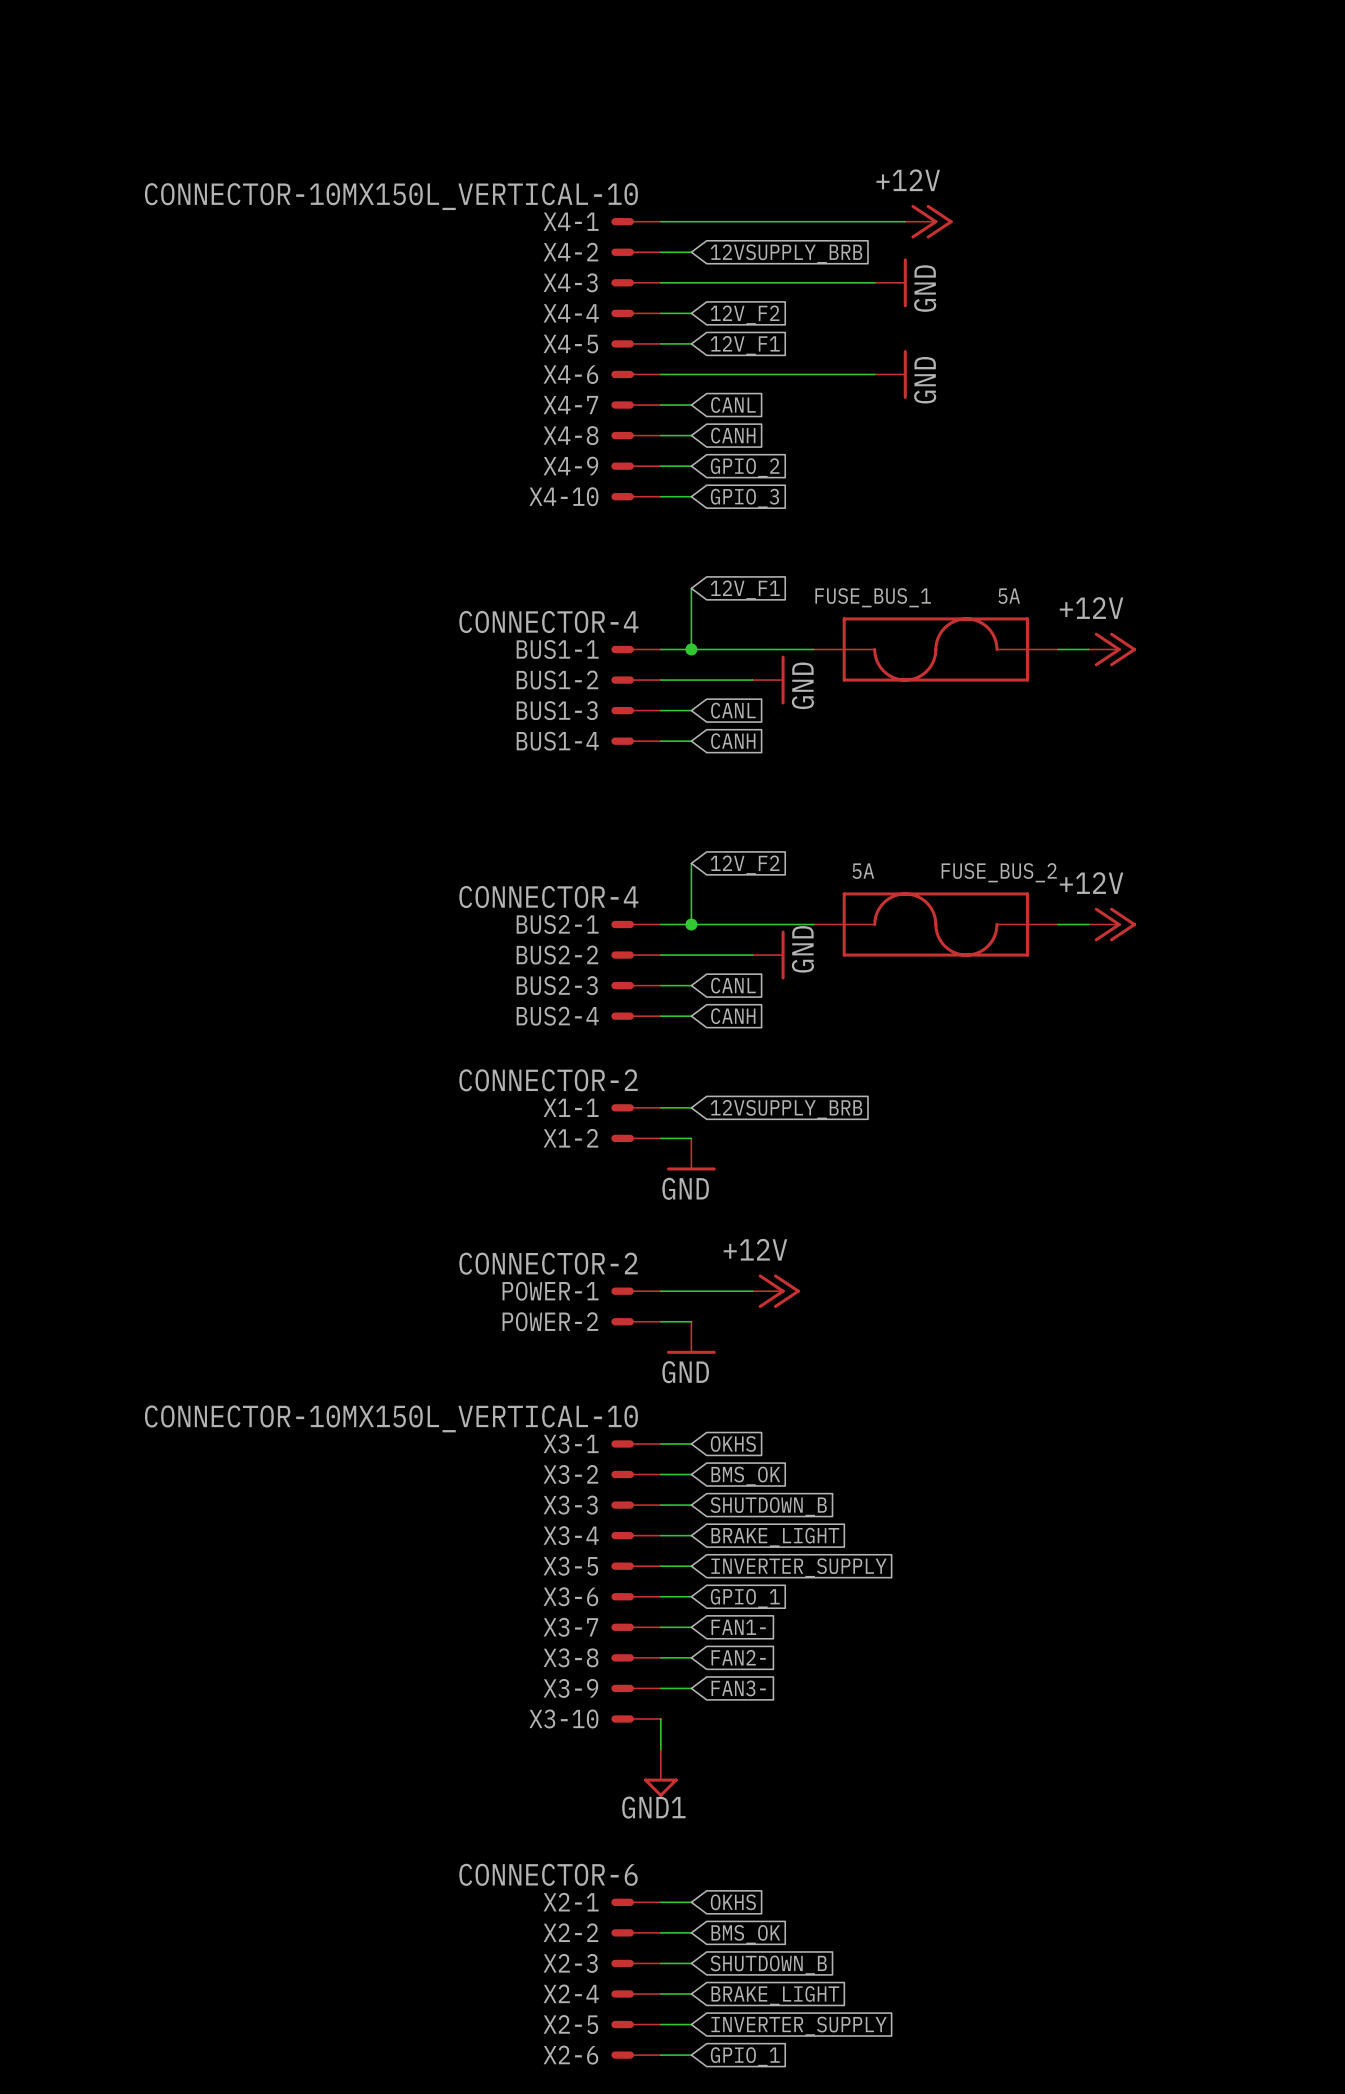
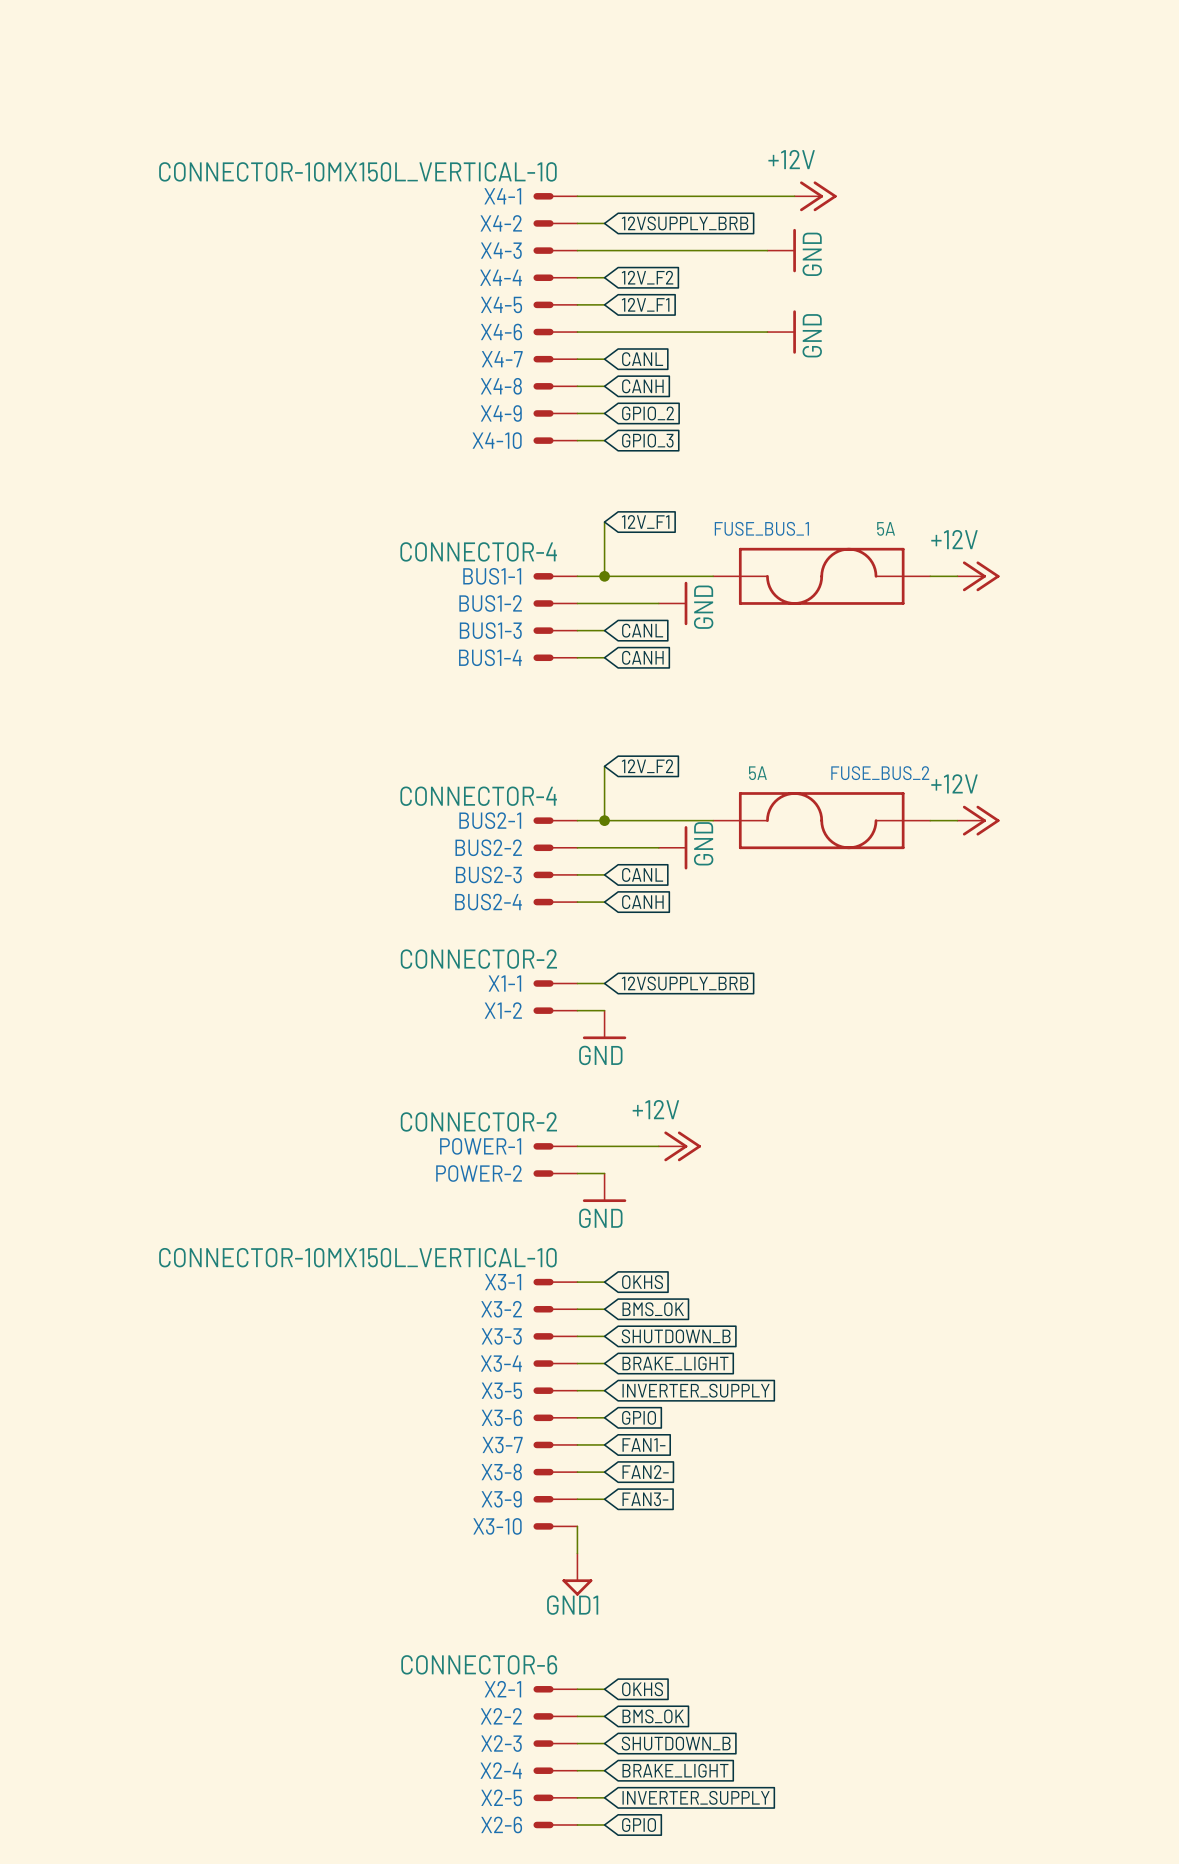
global label: GPIO_1 (745, 1598) -> GPIO (639, 1417)
global label: GPIO_1 (745, 2056) -> GPIO (639, 1824)

